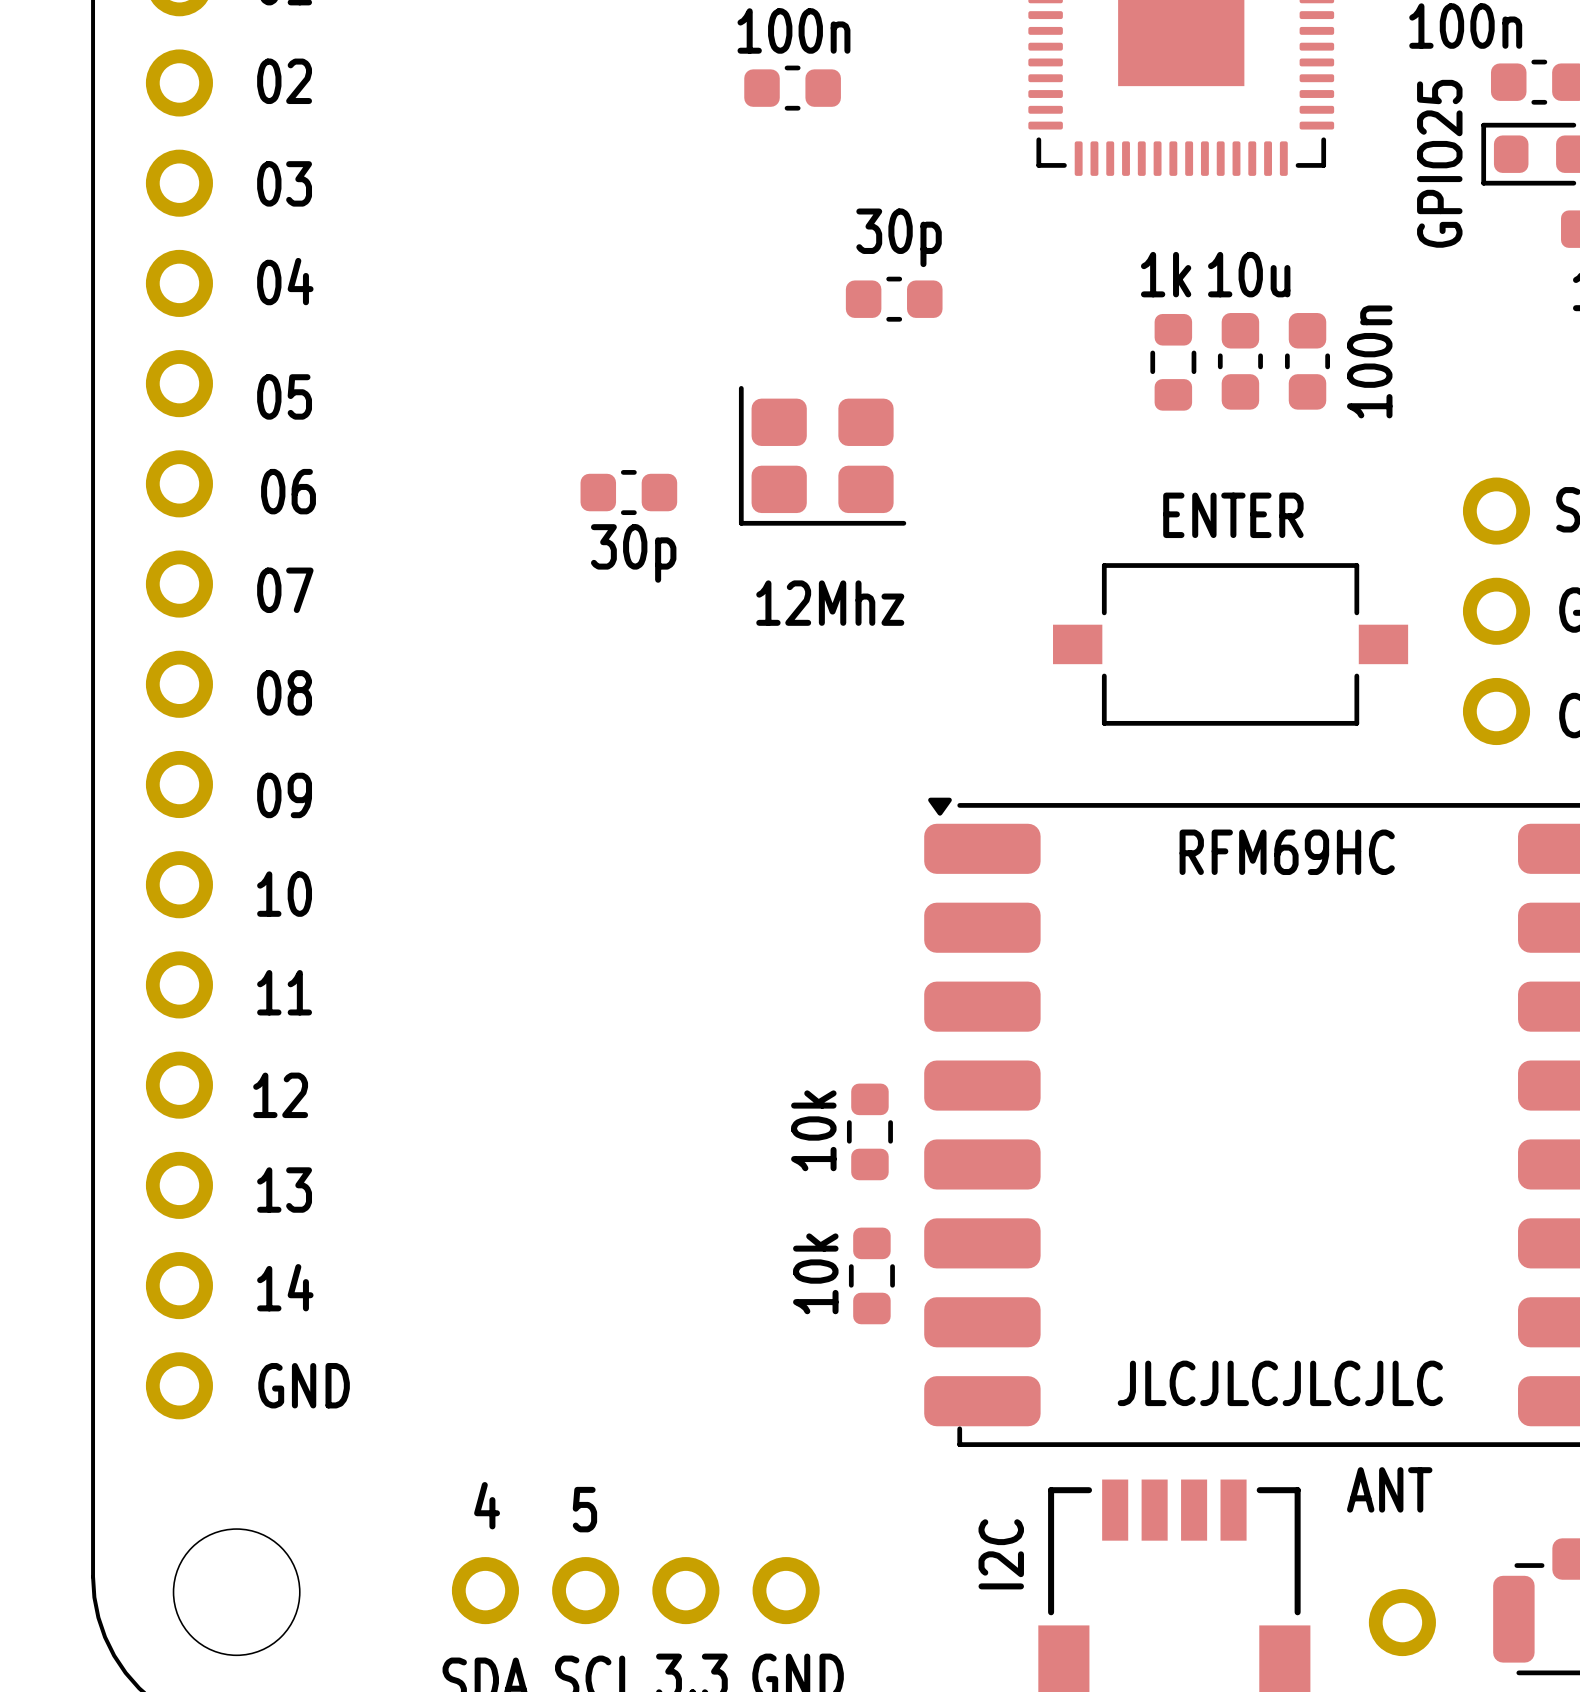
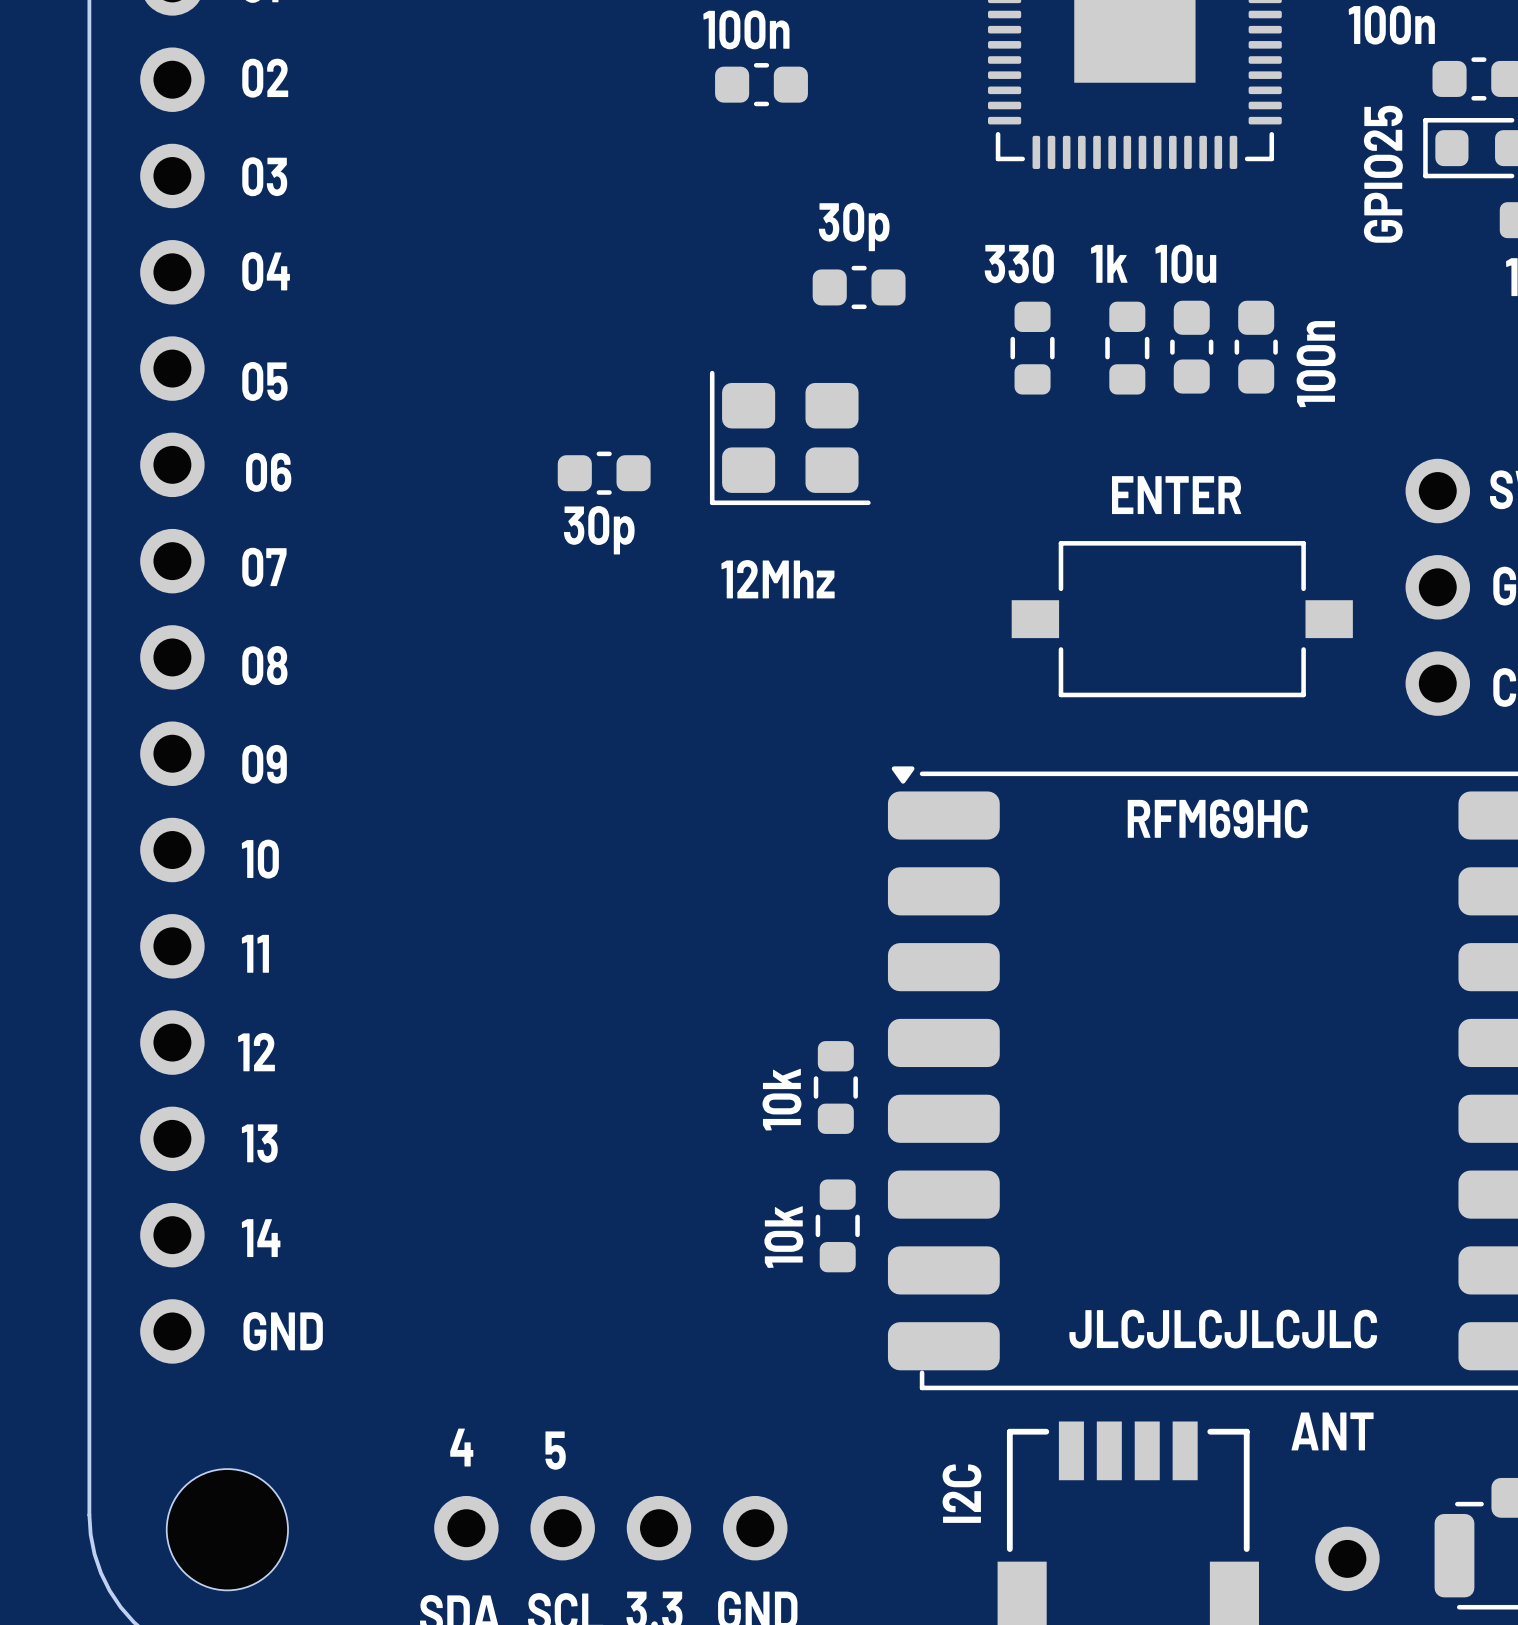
text: none -> 330 (1019, 263)
part: none -> (1032, 348)

